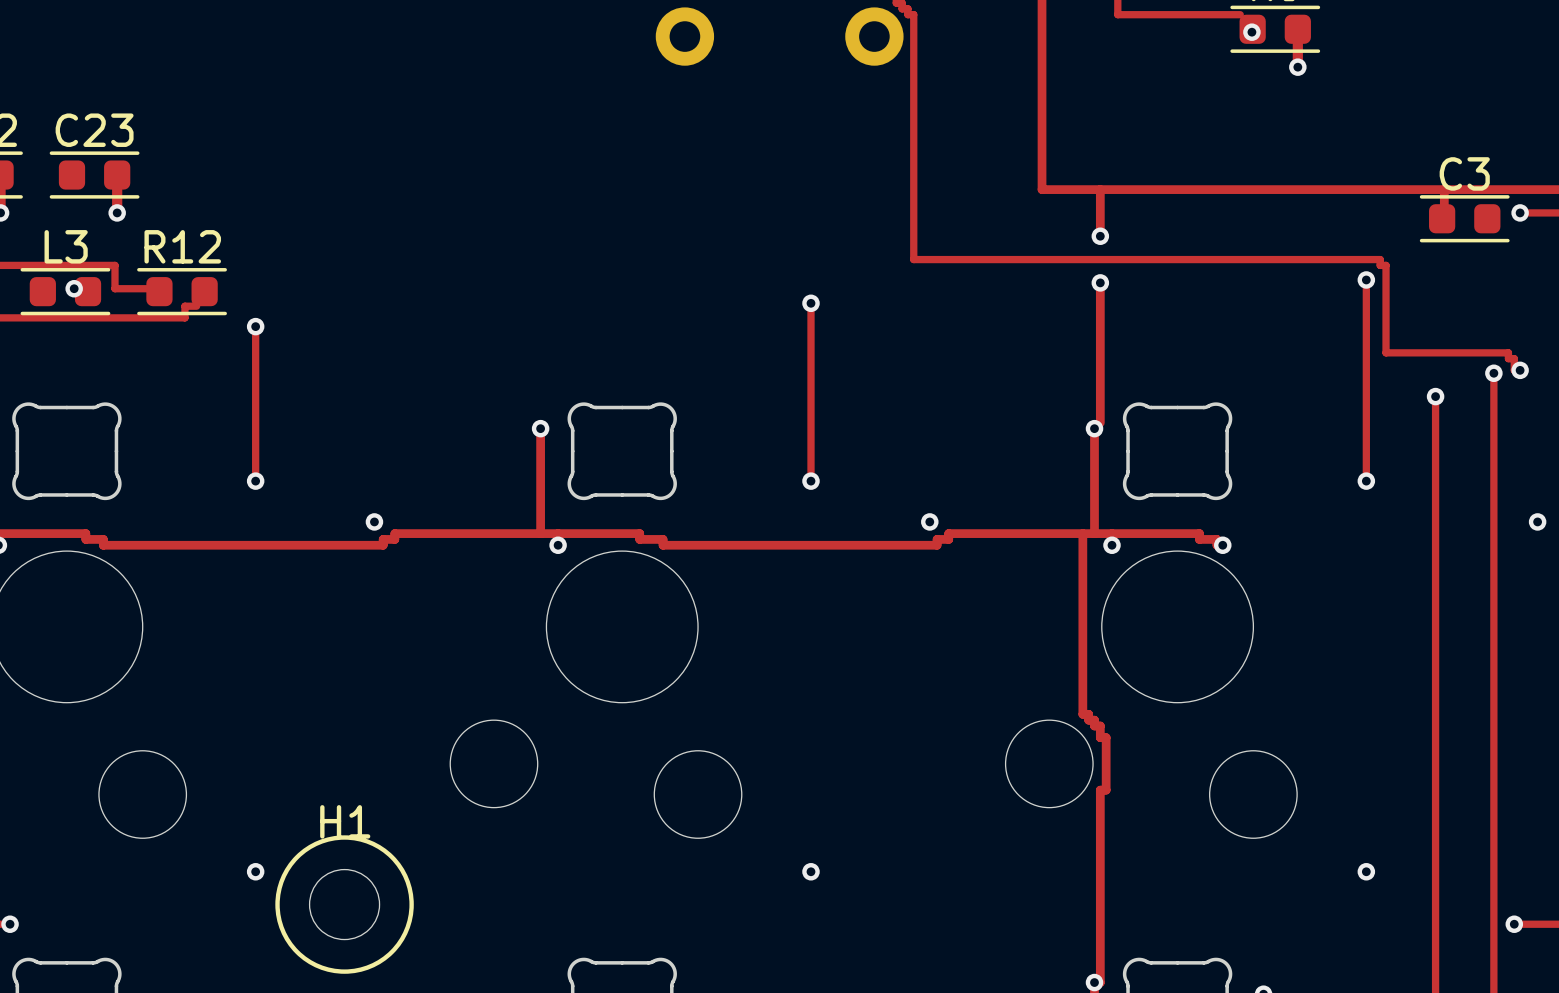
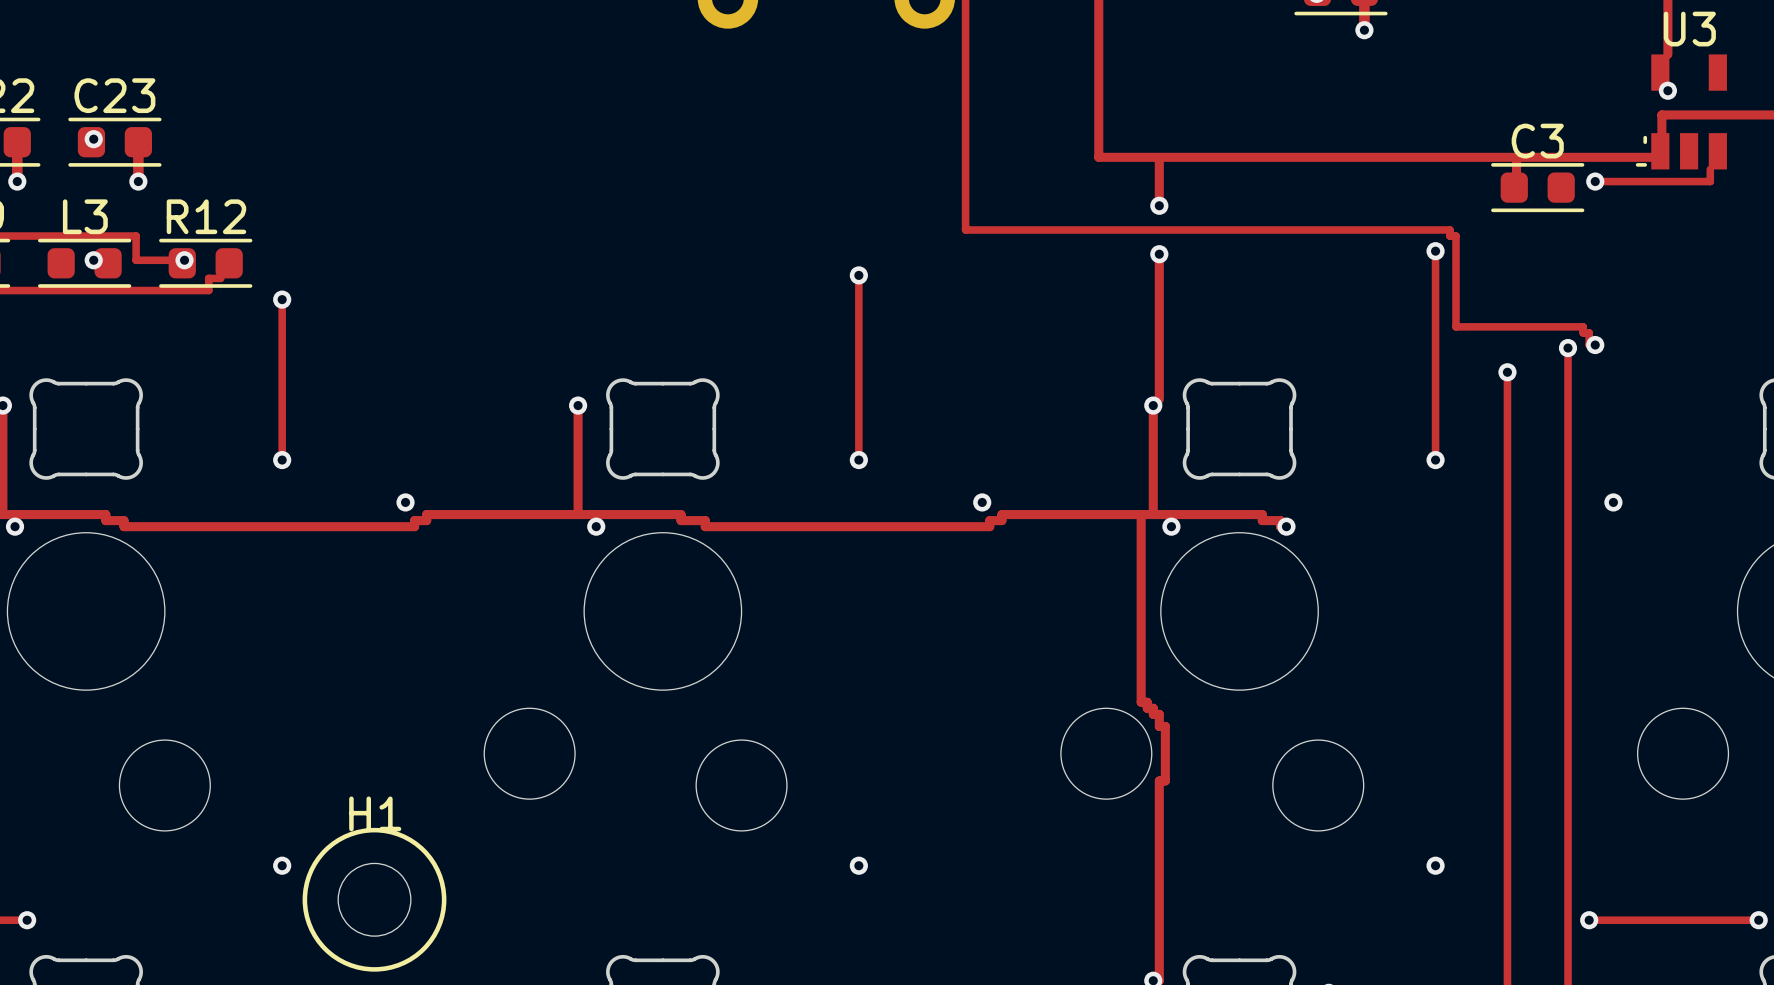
via: none -> (93, 139)
via: none -> (184, 260)

